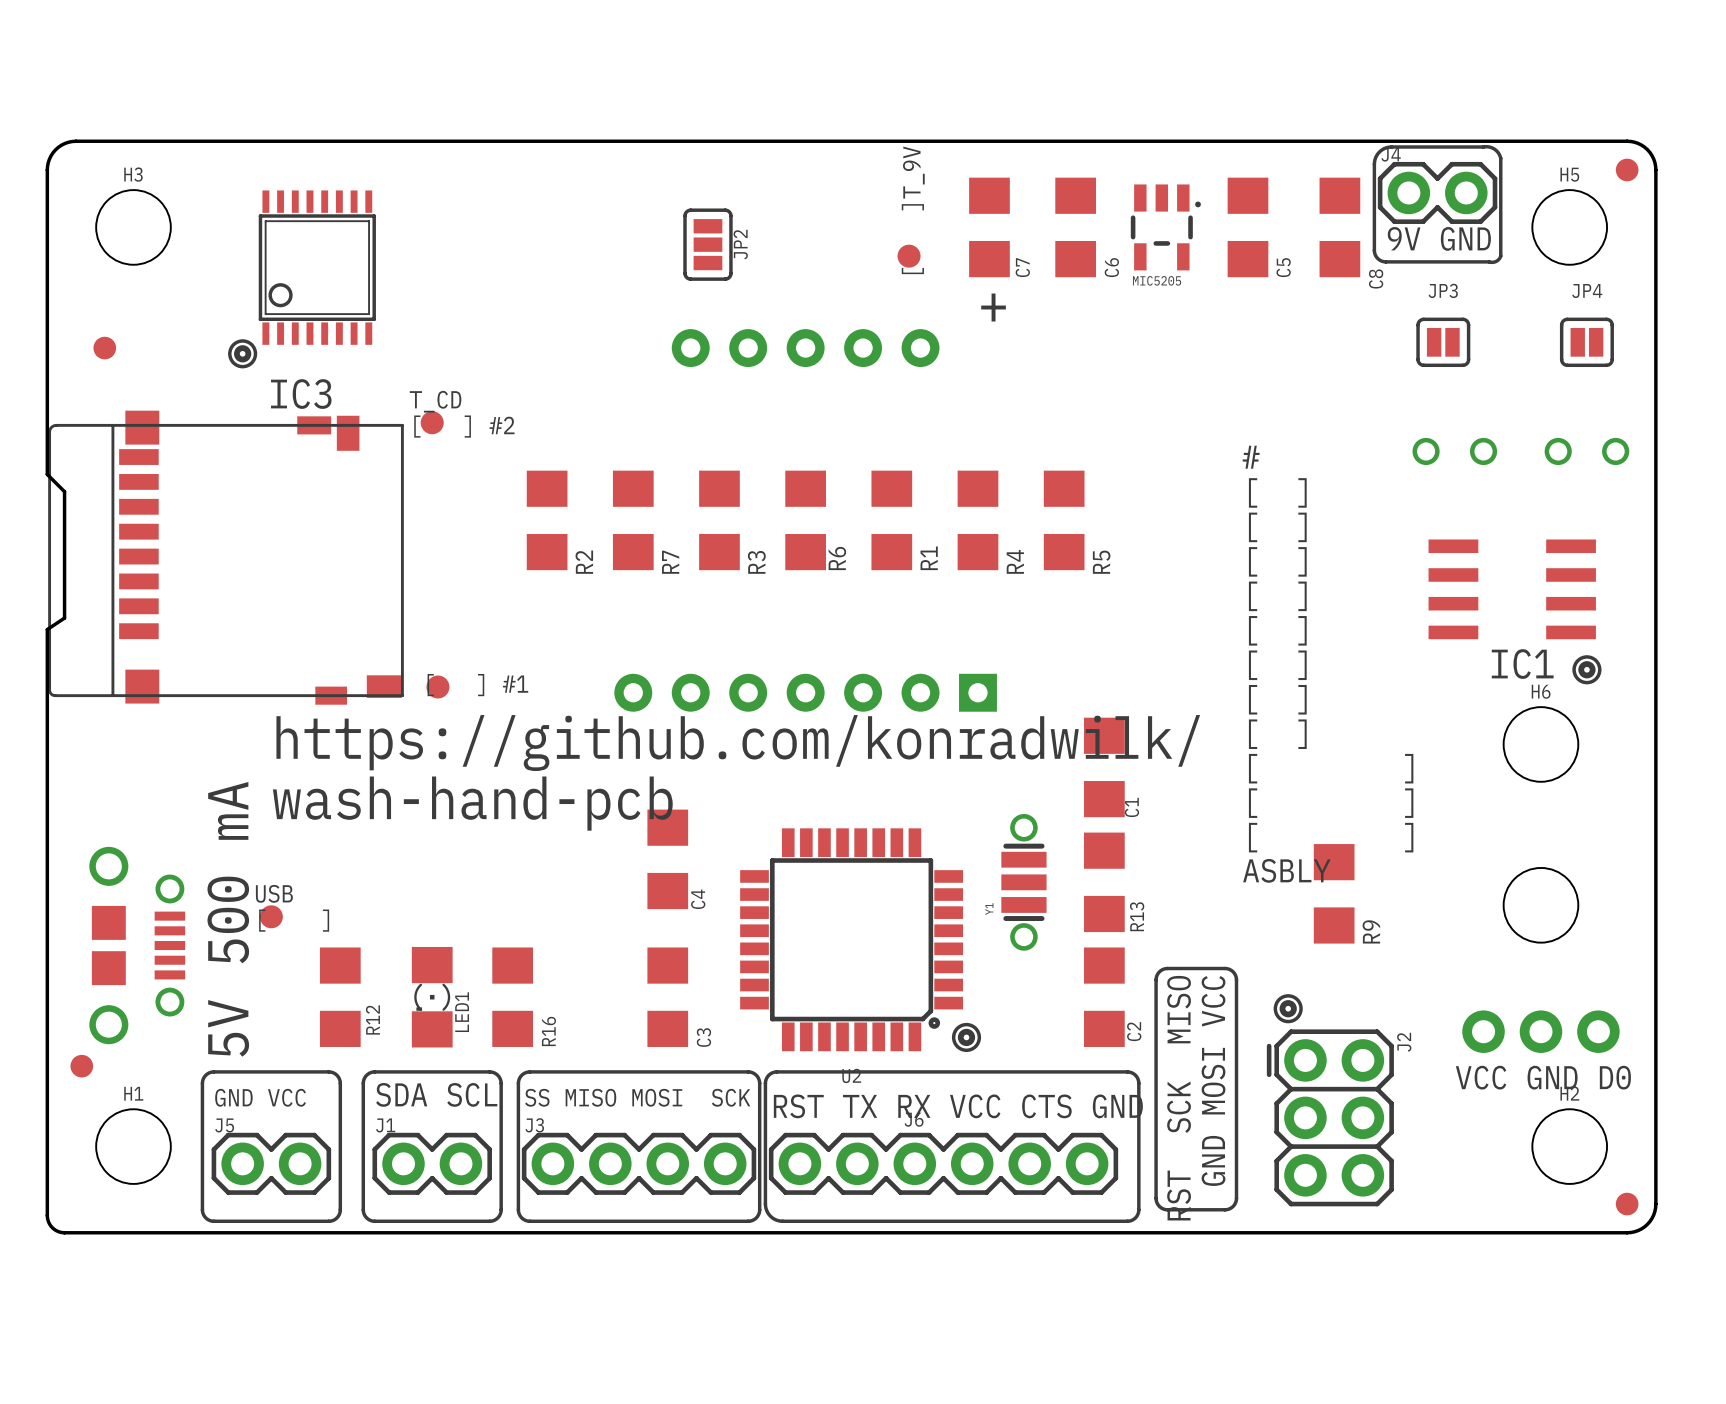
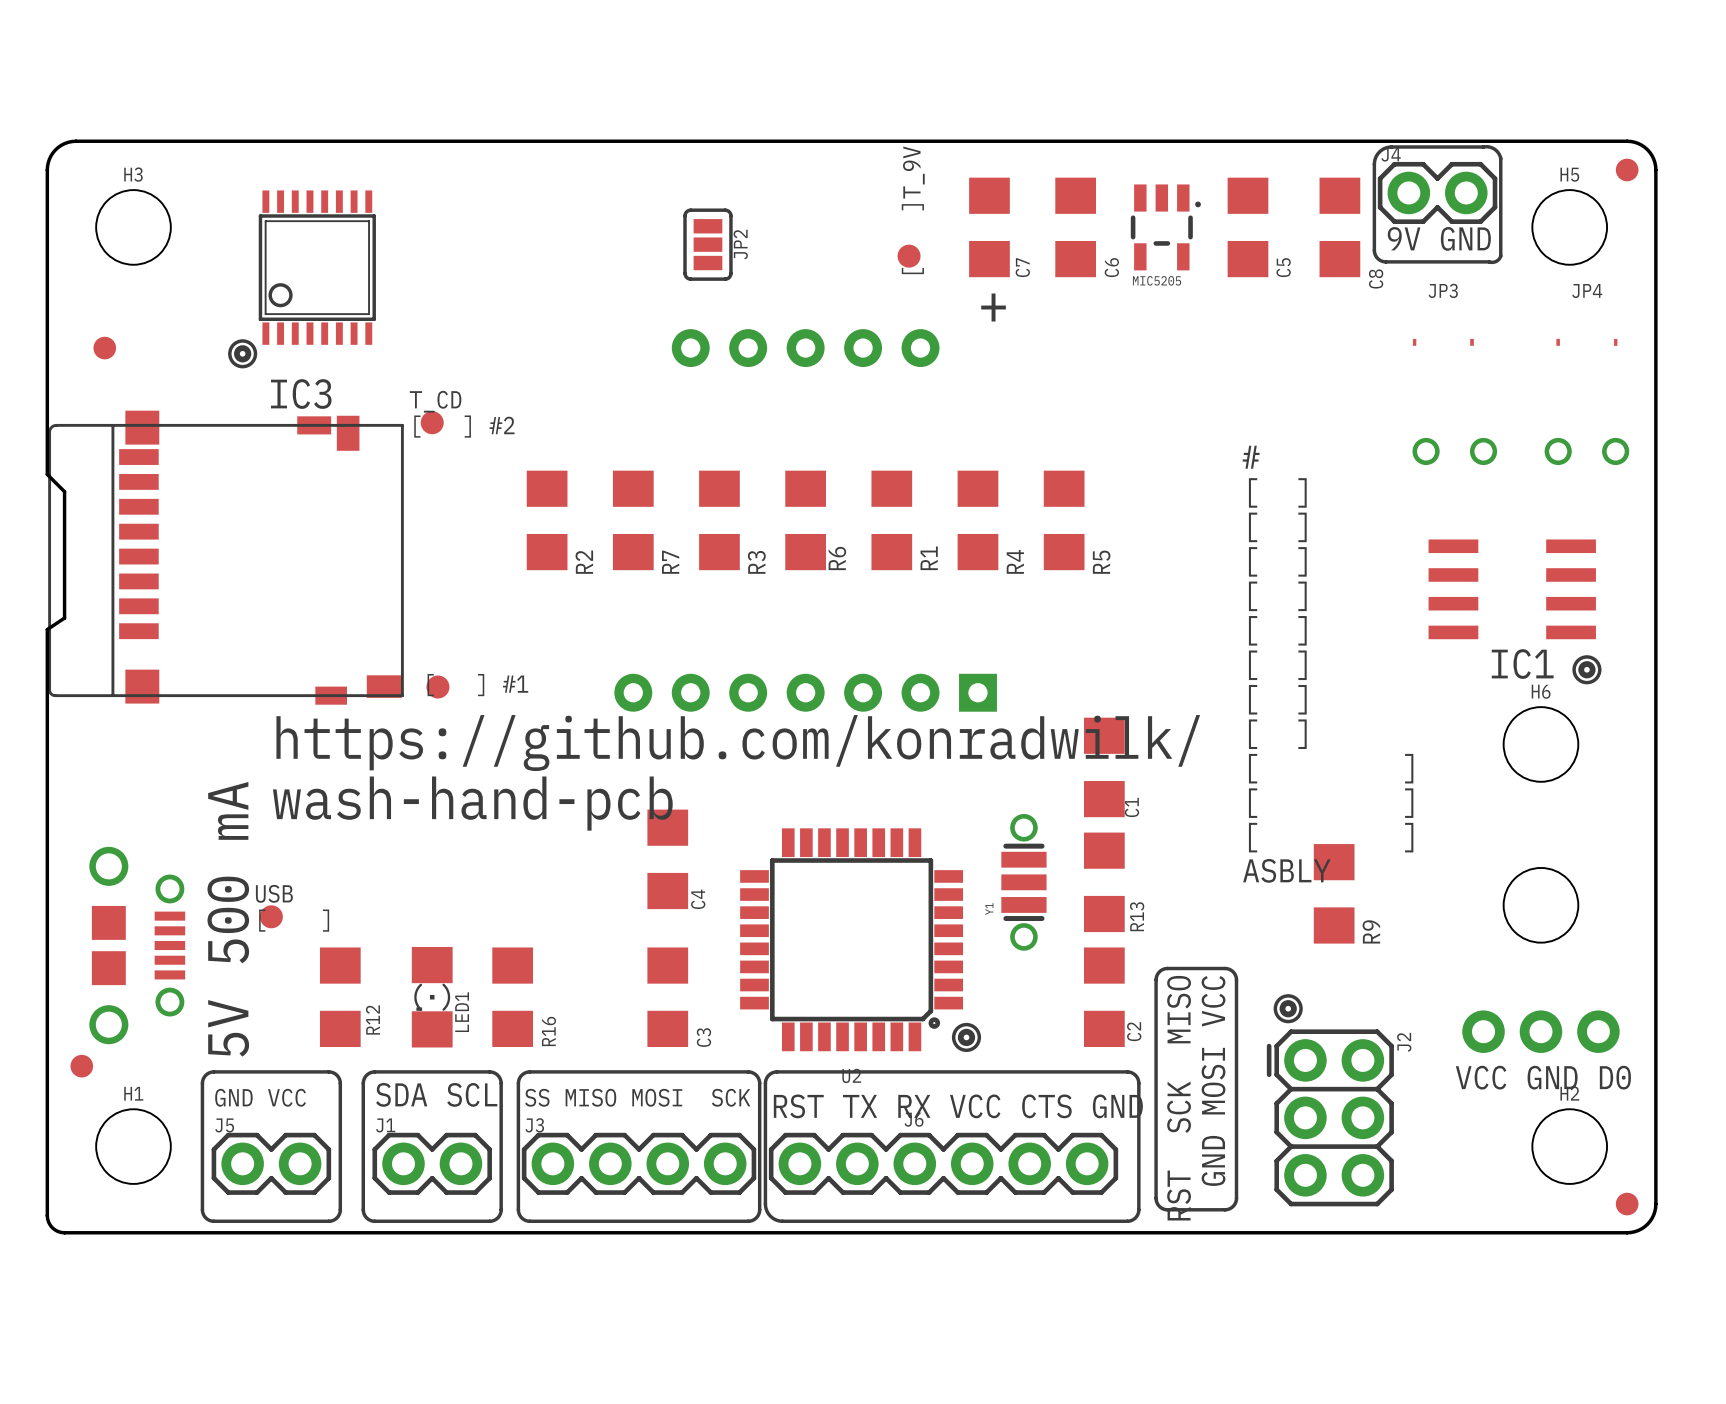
JP3 footprint: [1416, 317, 1471, 368] -> [1412, 338, 1474, 346]
JP4 footprint: [1559, 317, 1614, 368] -> [1556, 338, 1618, 346]

